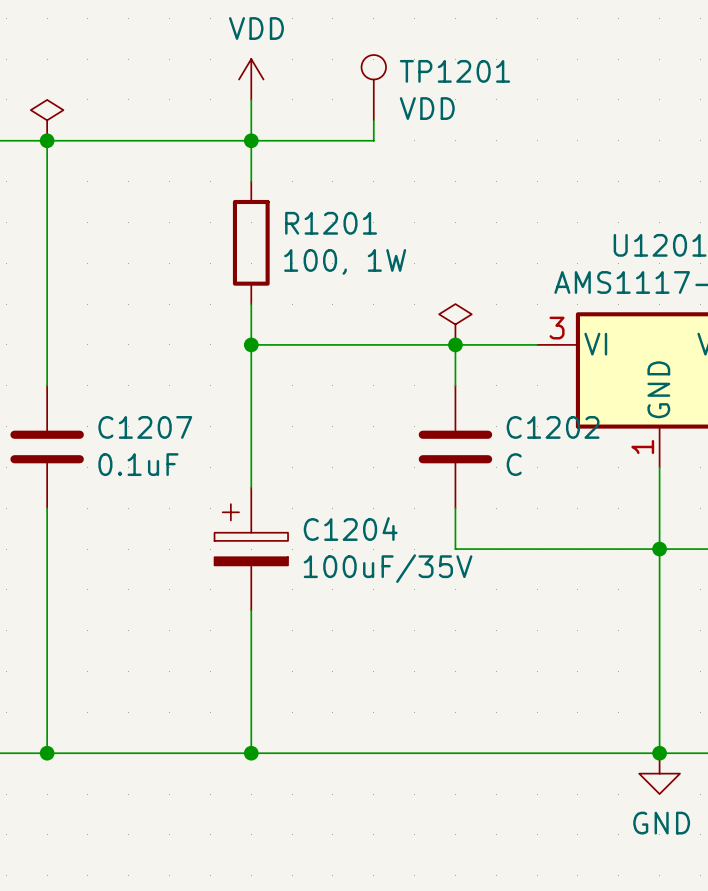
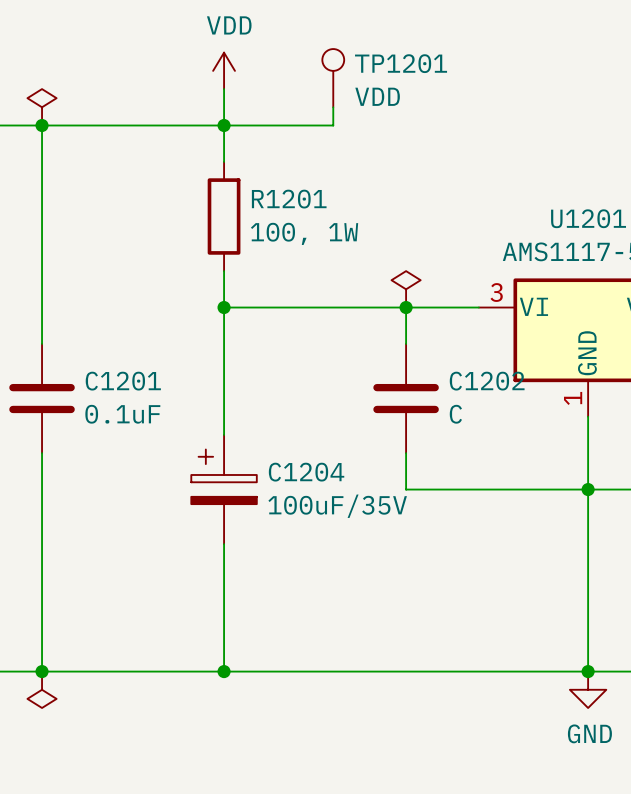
C1207 name: C1207 (145, 427) -> C1201 (123, 381)
power symbol: none -> (42, 689)

